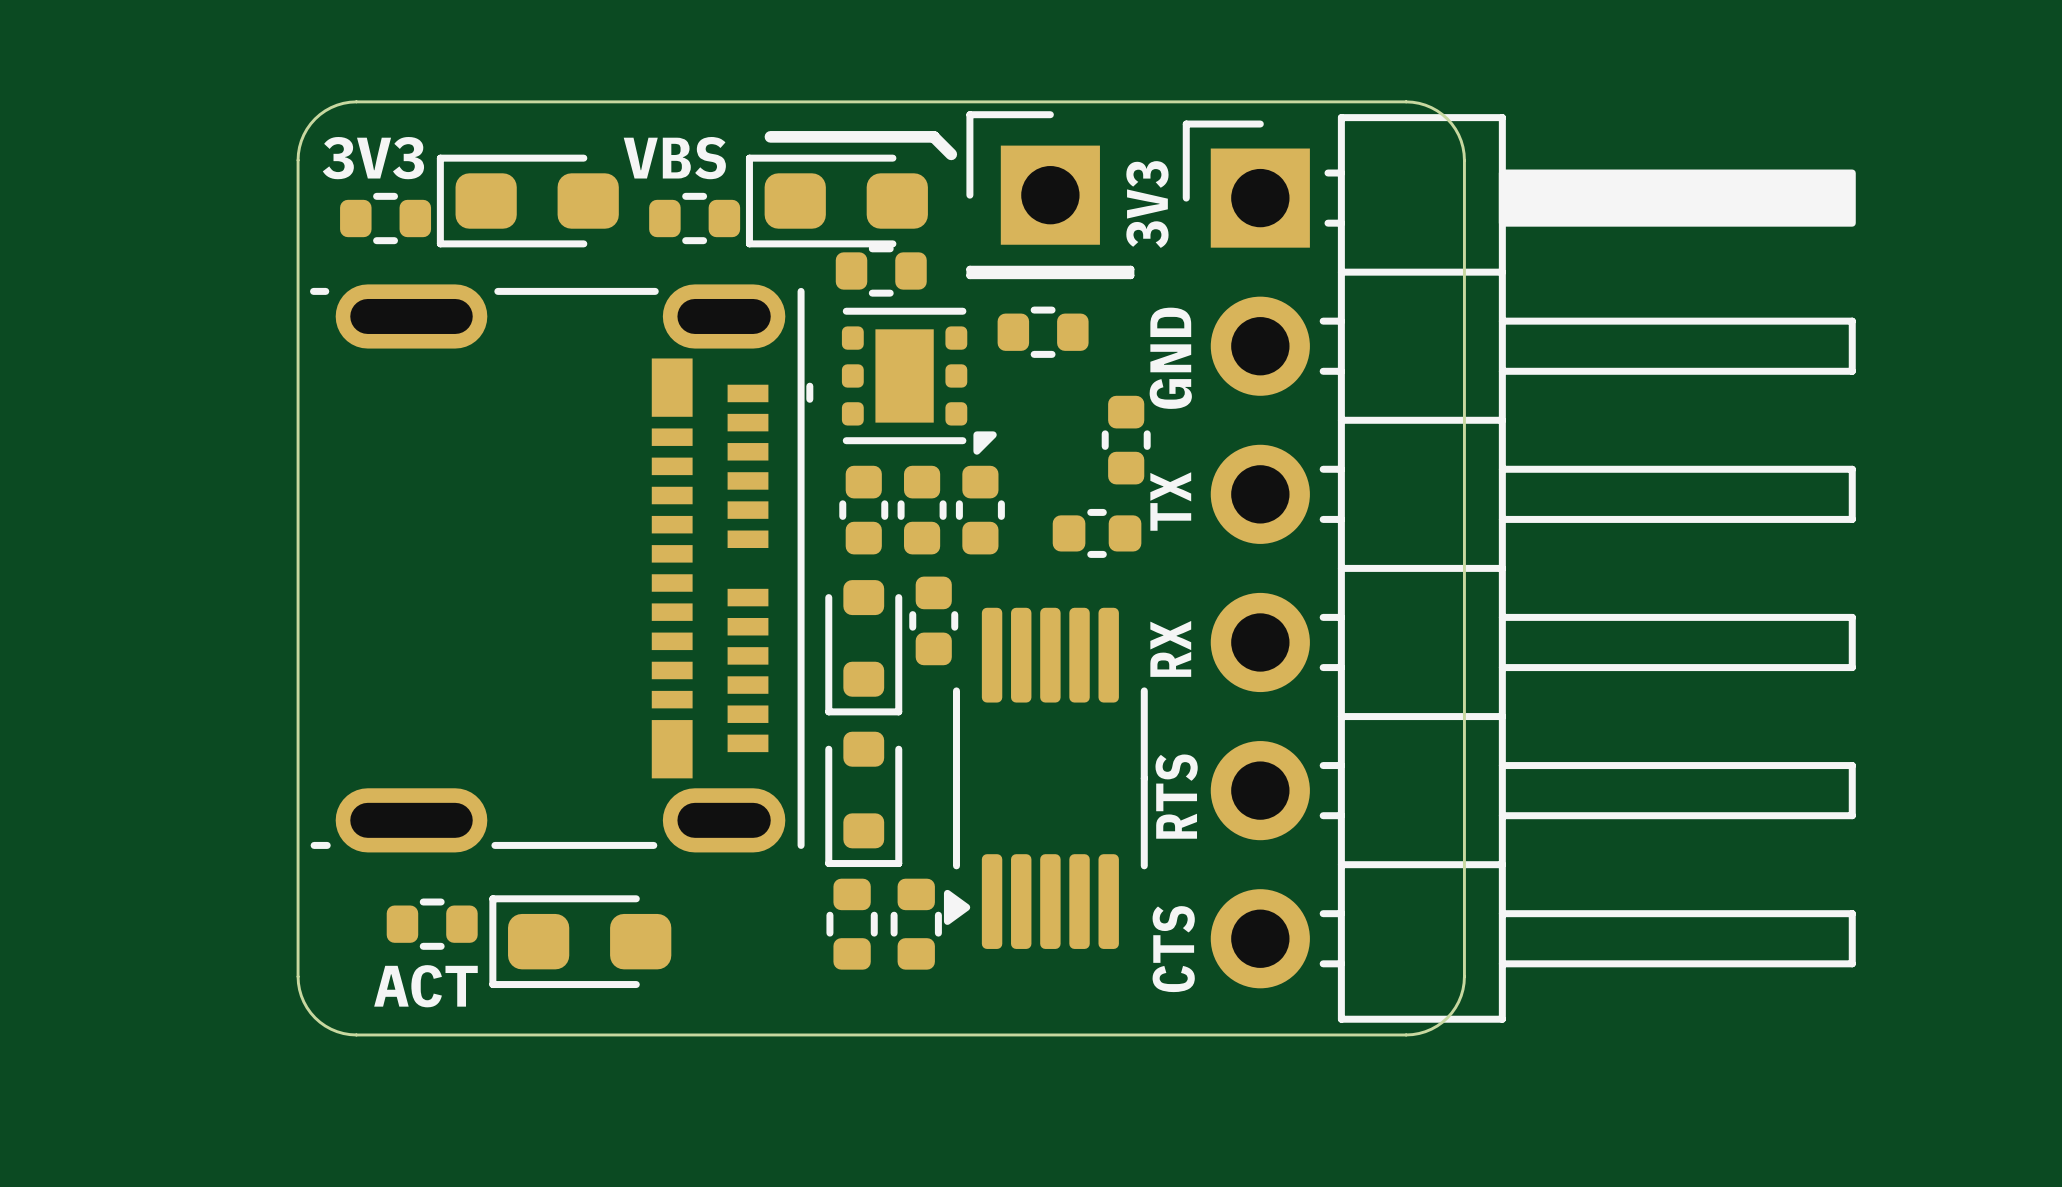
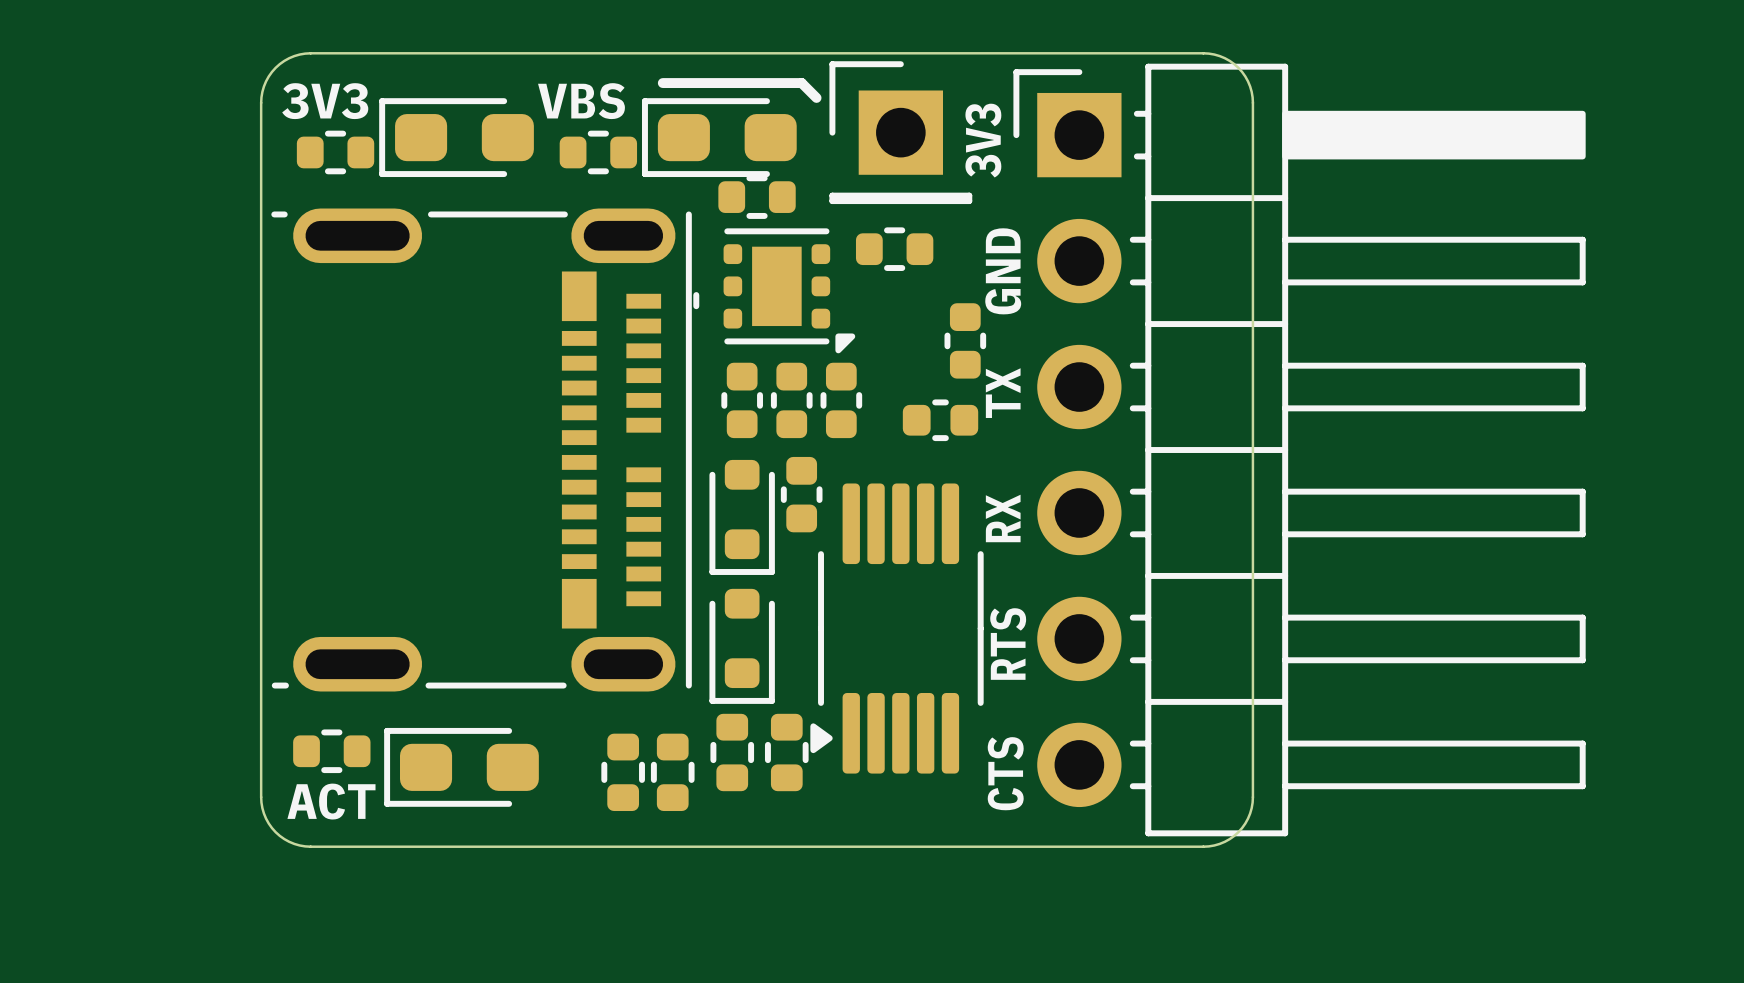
part position: (432, 924) -> (331, 751)
part position: (580, 941) -> (461, 767)
part: none -> (623, 772)
part: none -> (672, 772)
text position: ACT (425, 986) -> ACT (331, 801)

